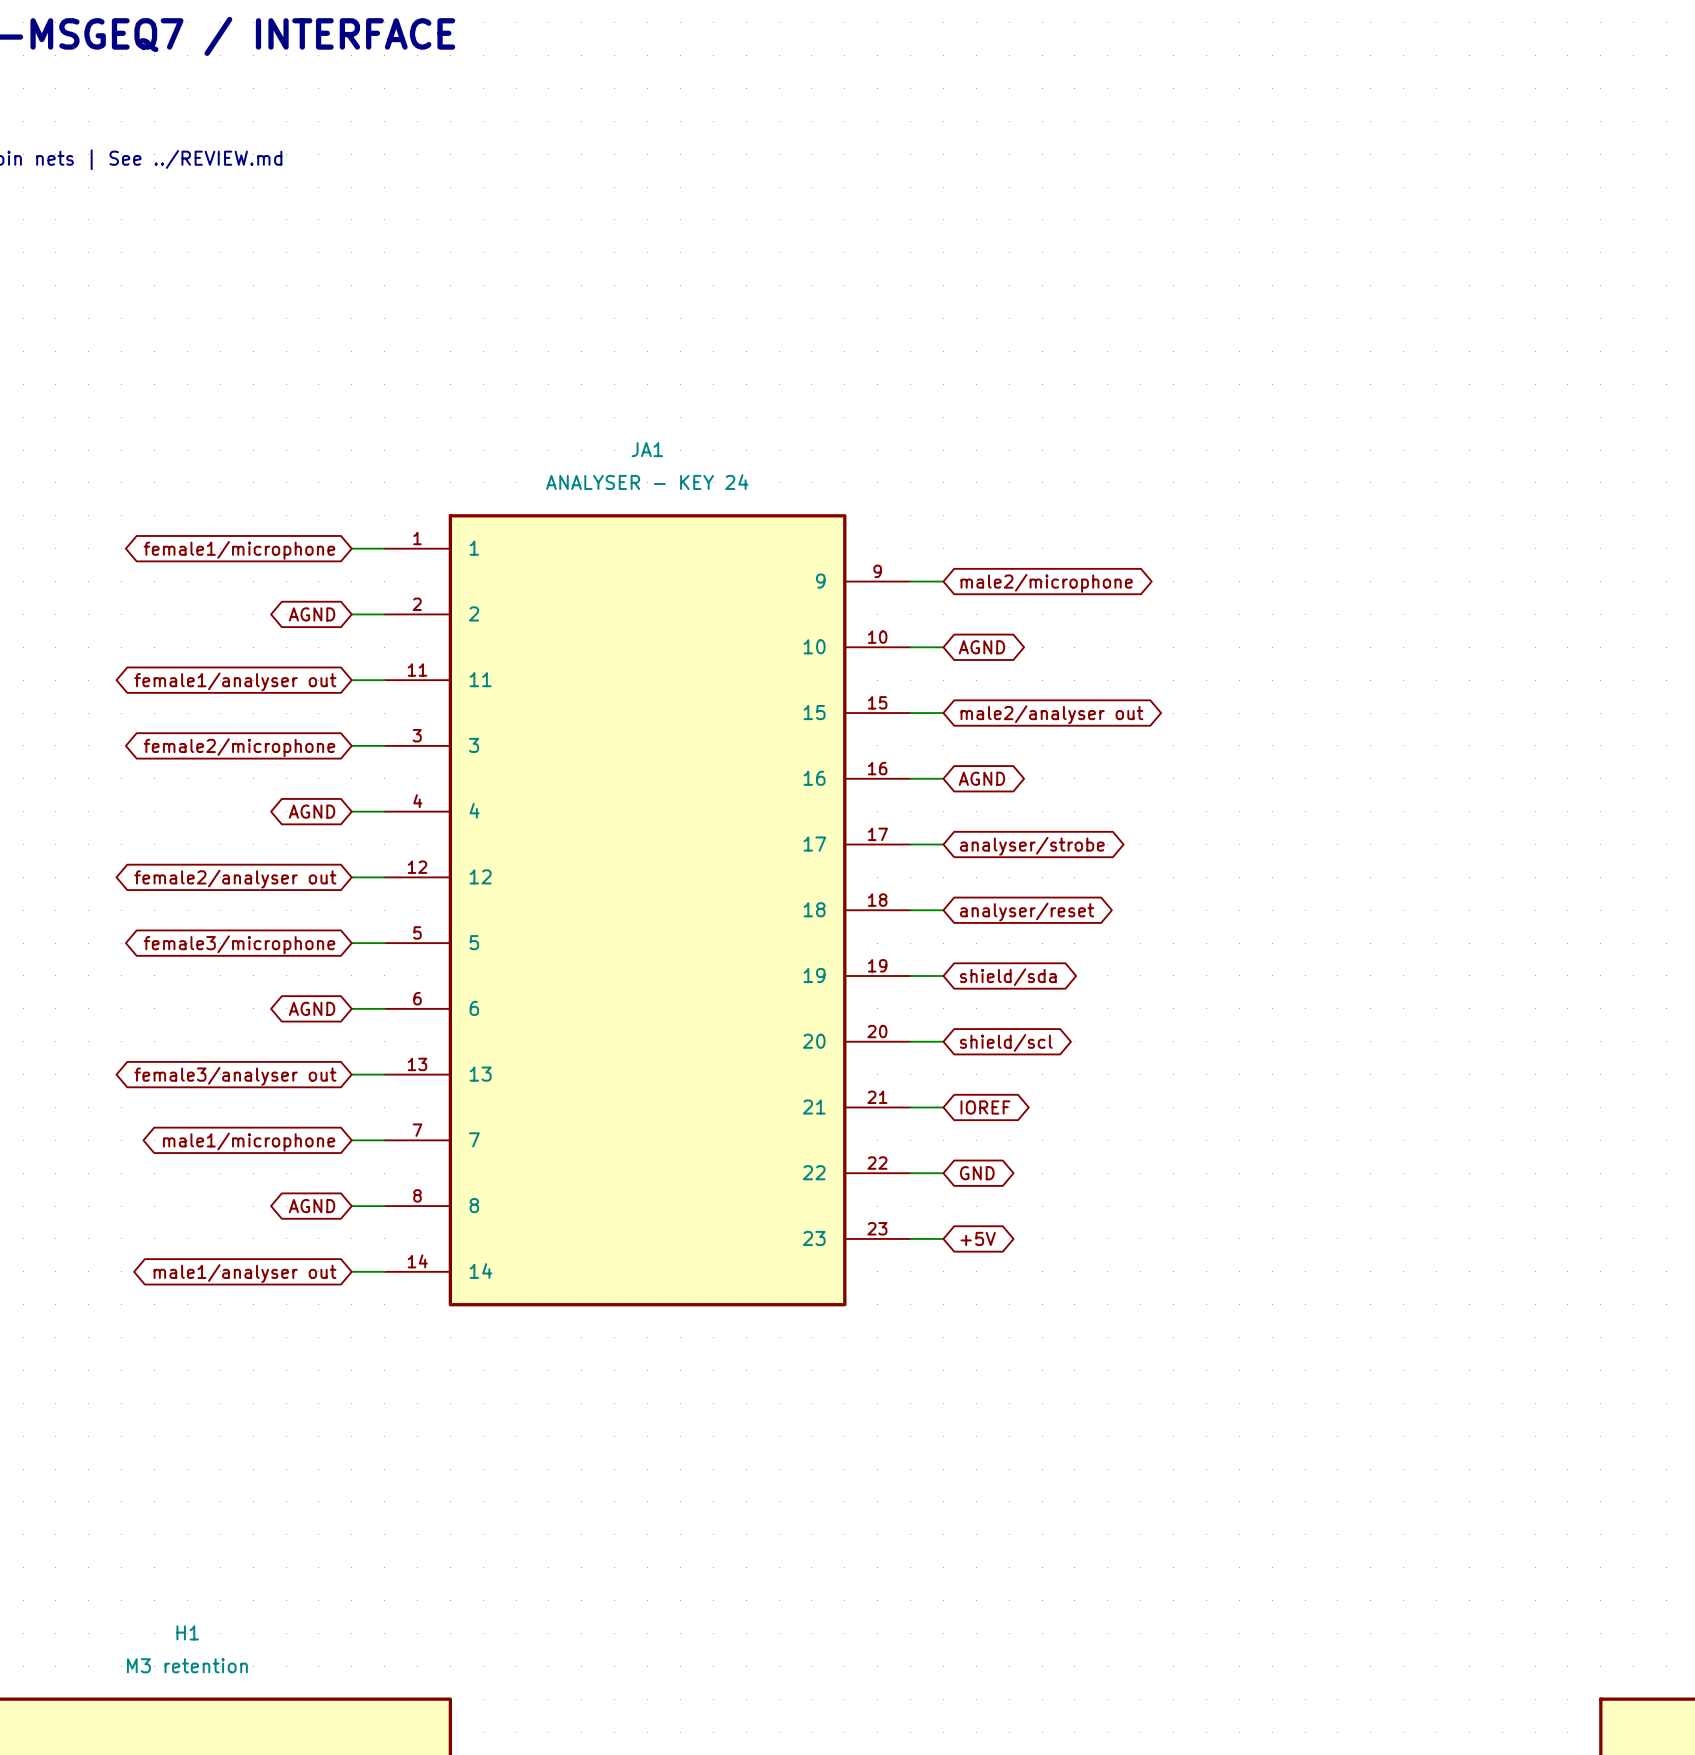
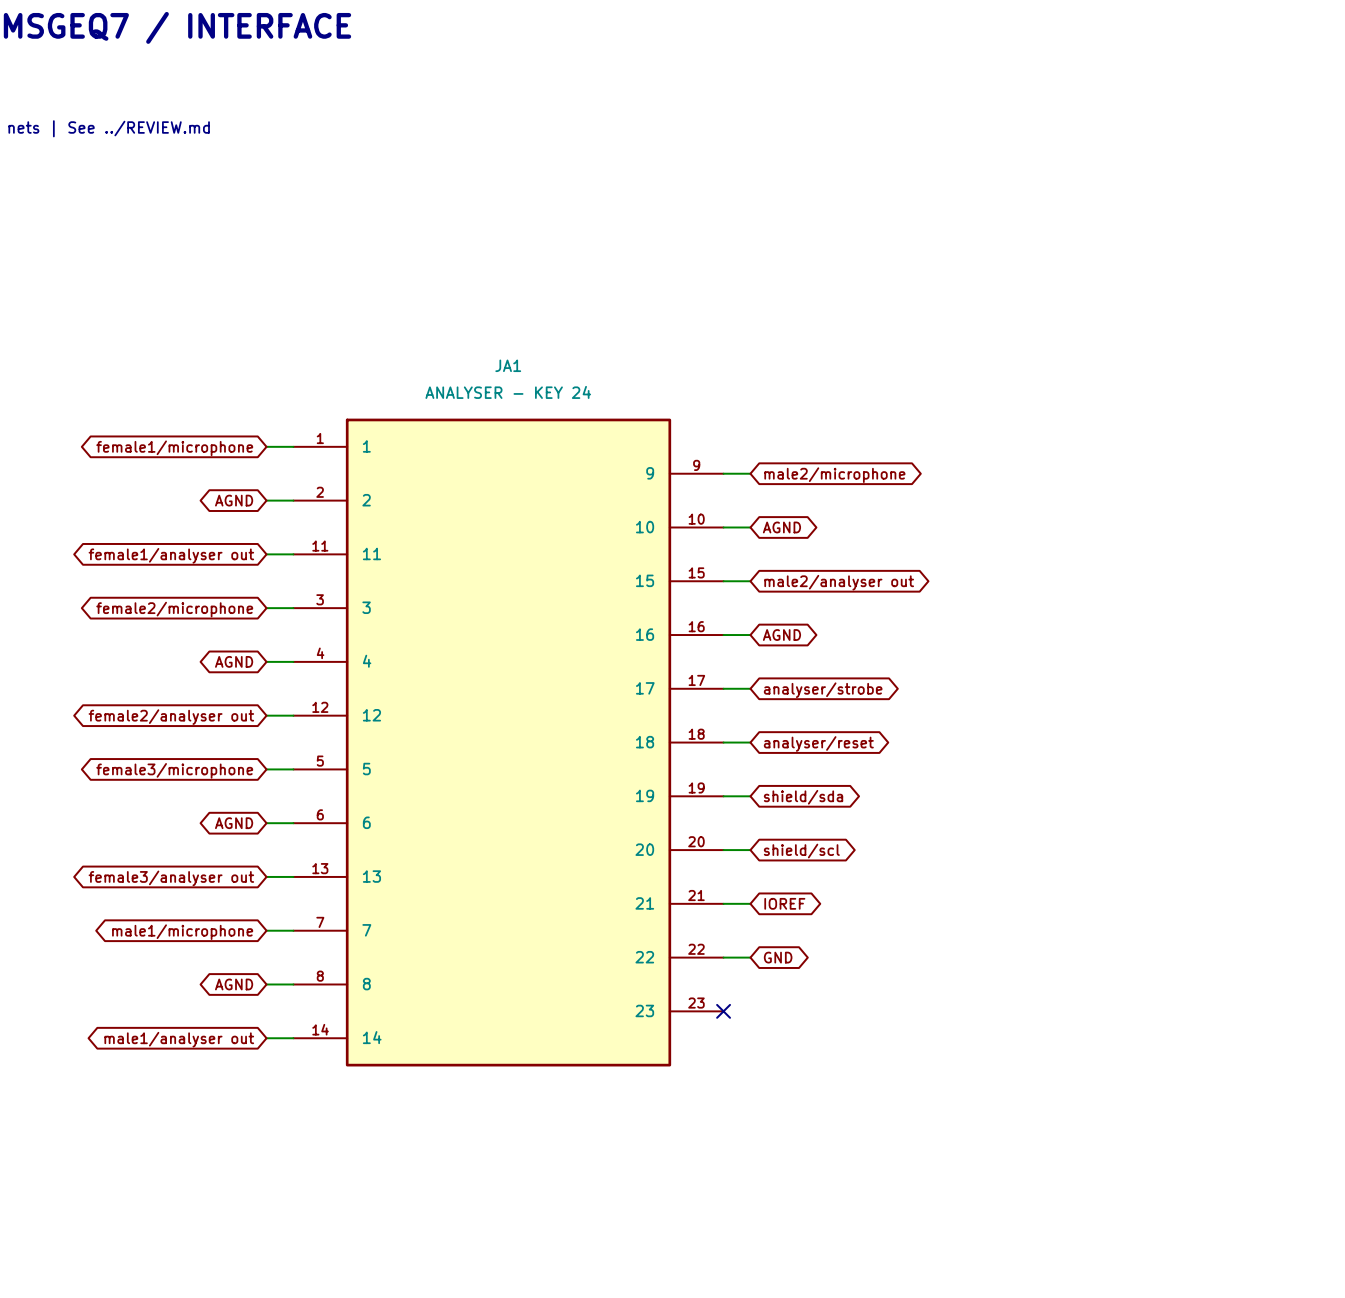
wire: (910, 1238) (943, 1238) -> none
no-connect mark: none -> (723, 1011)
global label: +5V (978, 1238) -> none

